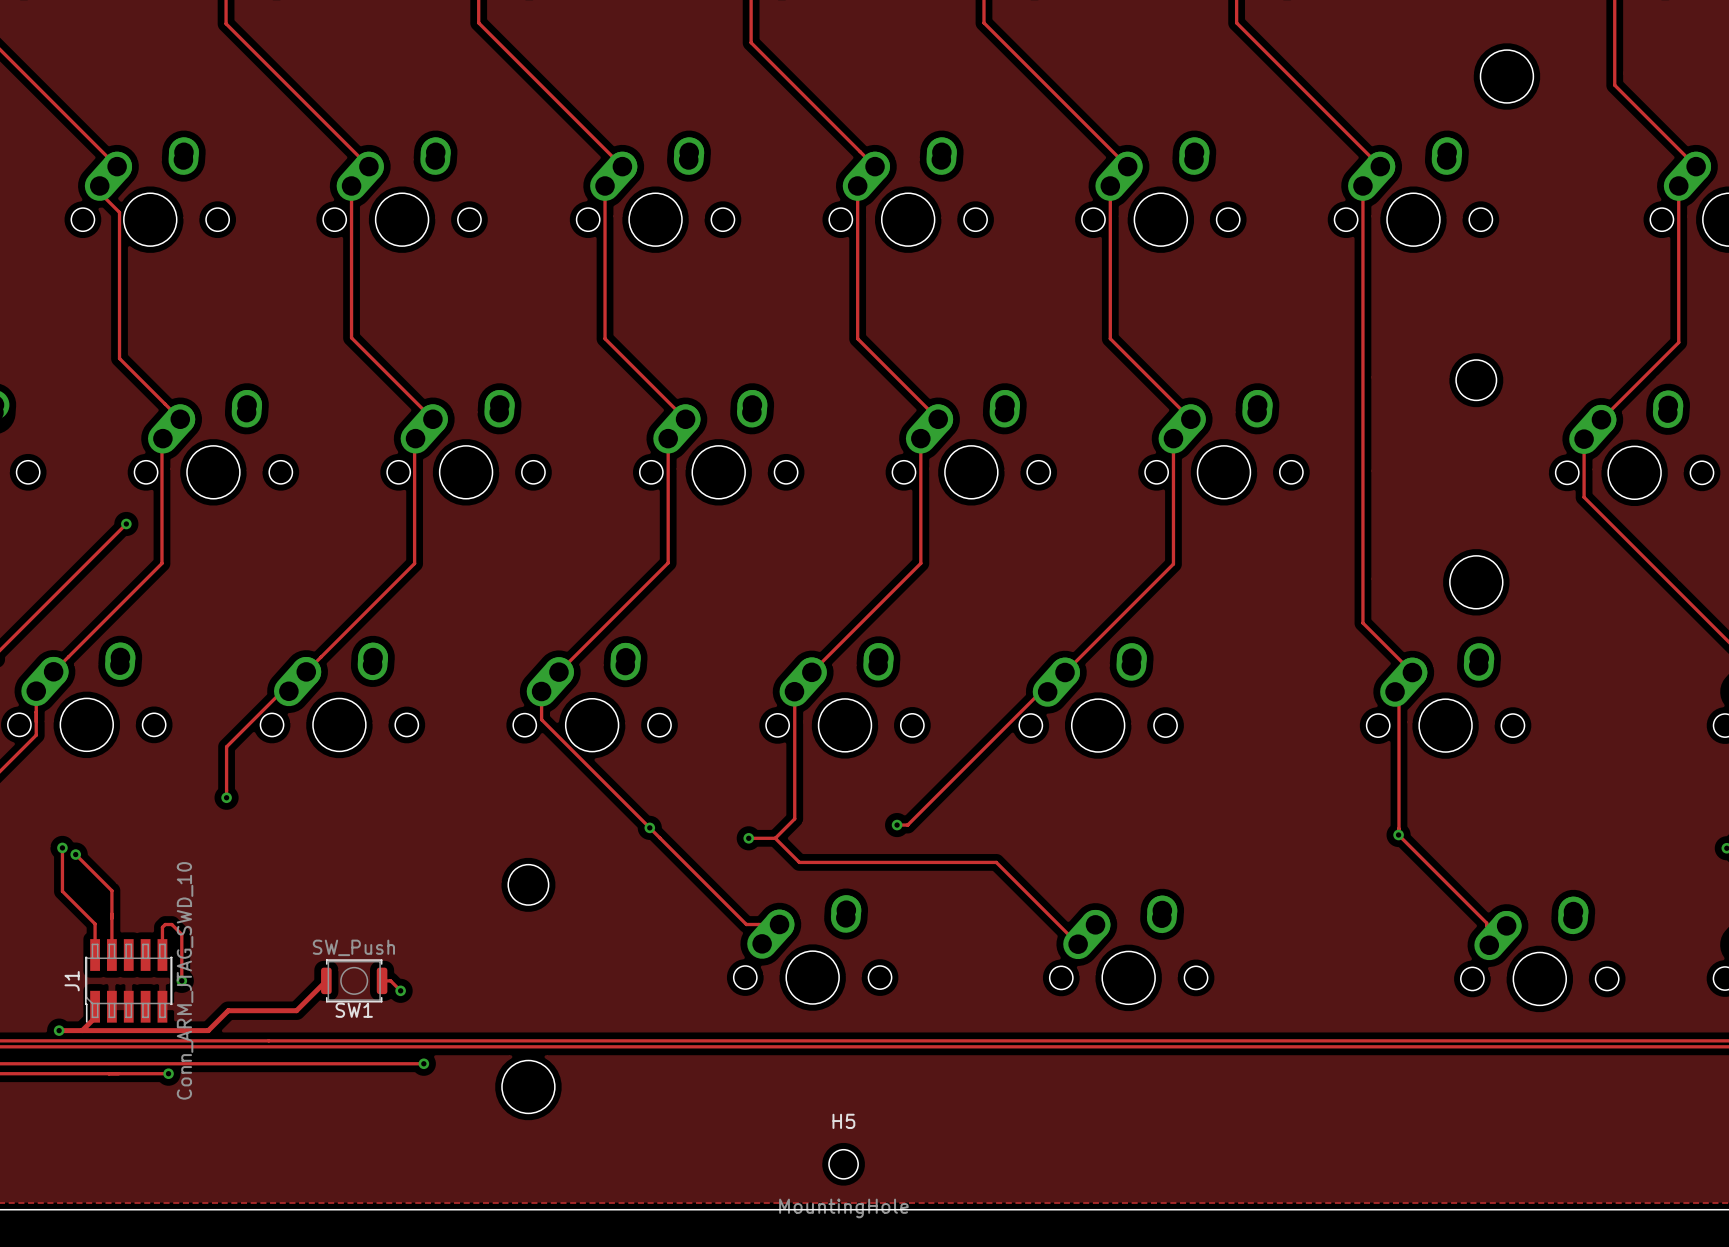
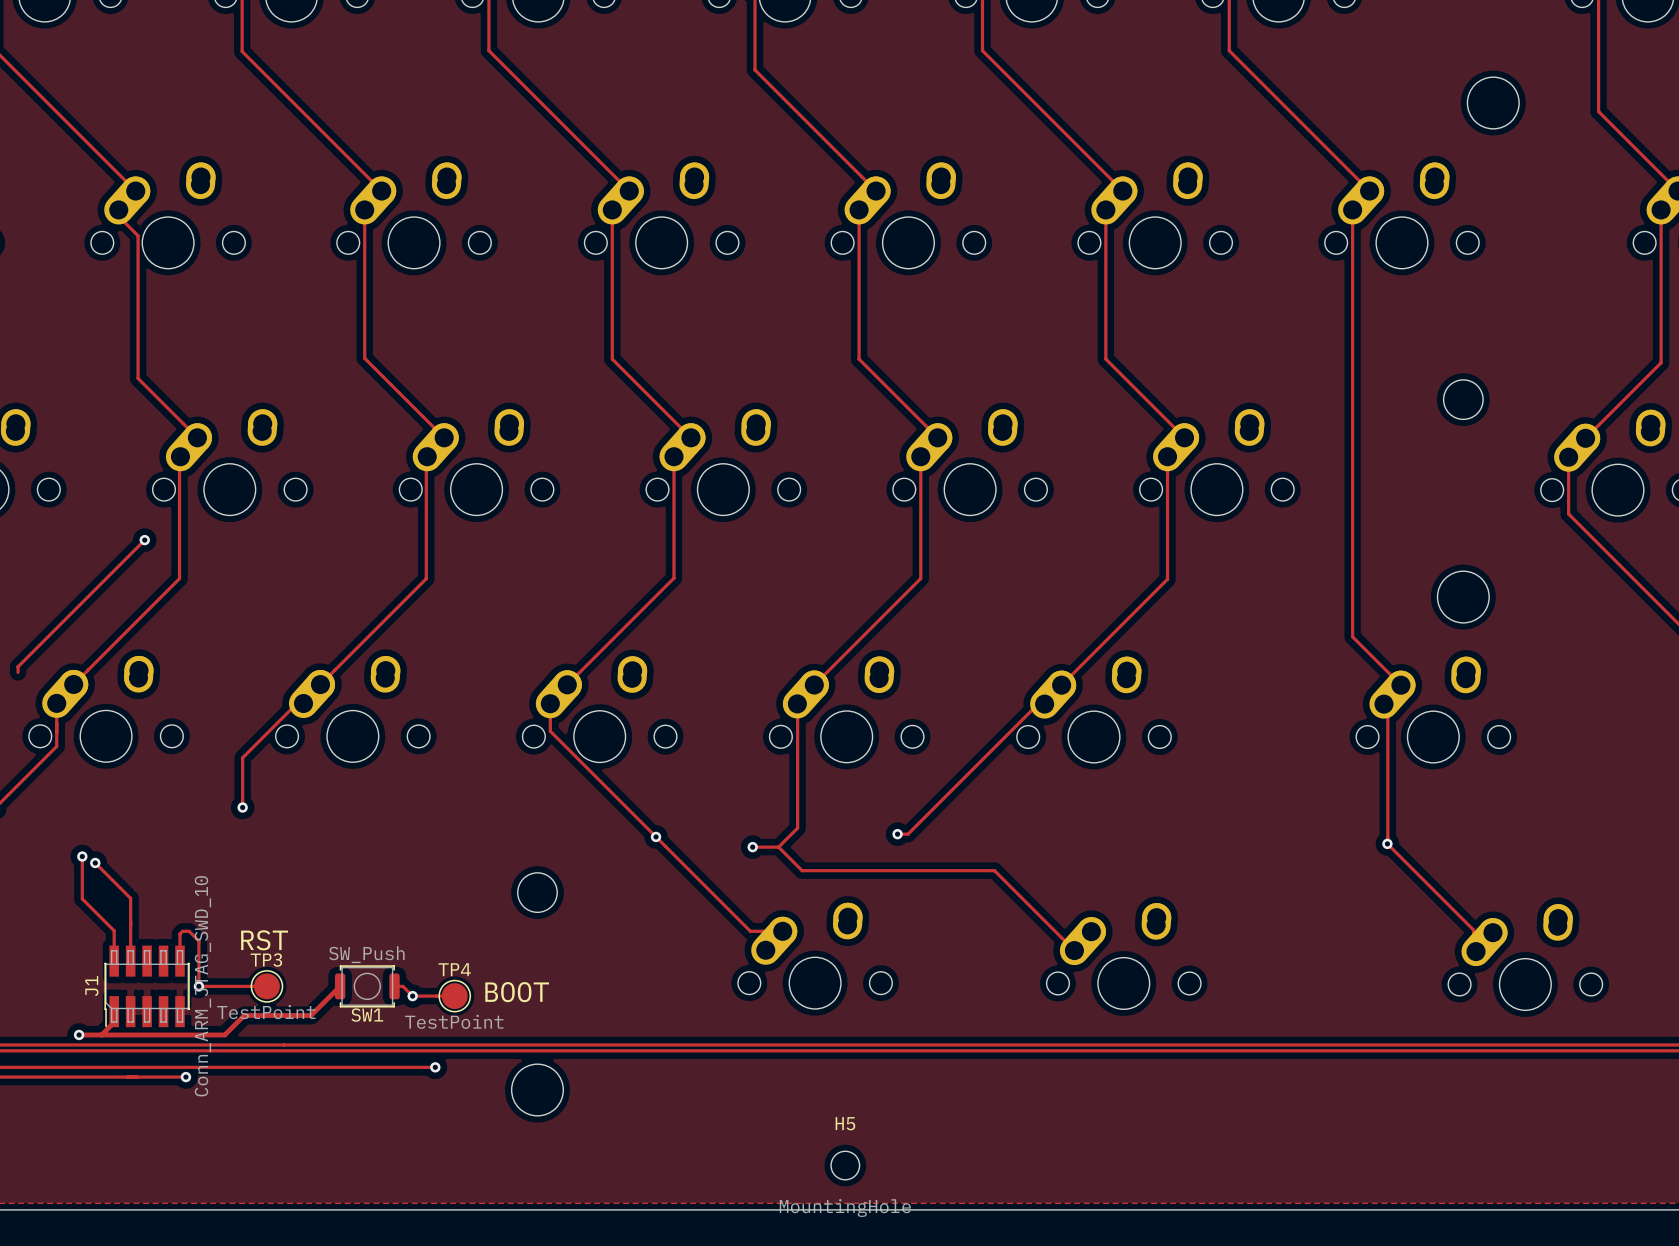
text: none -> RST (264, 940)
track: none -> (198, 986) (266, 986)
TP3: none -> TestPoint (266, 986)
text: none -> BOOT (517, 992)
track: none -> (412, 996) (454, 996)
TP4: none -> TestPoint (454, 996)

